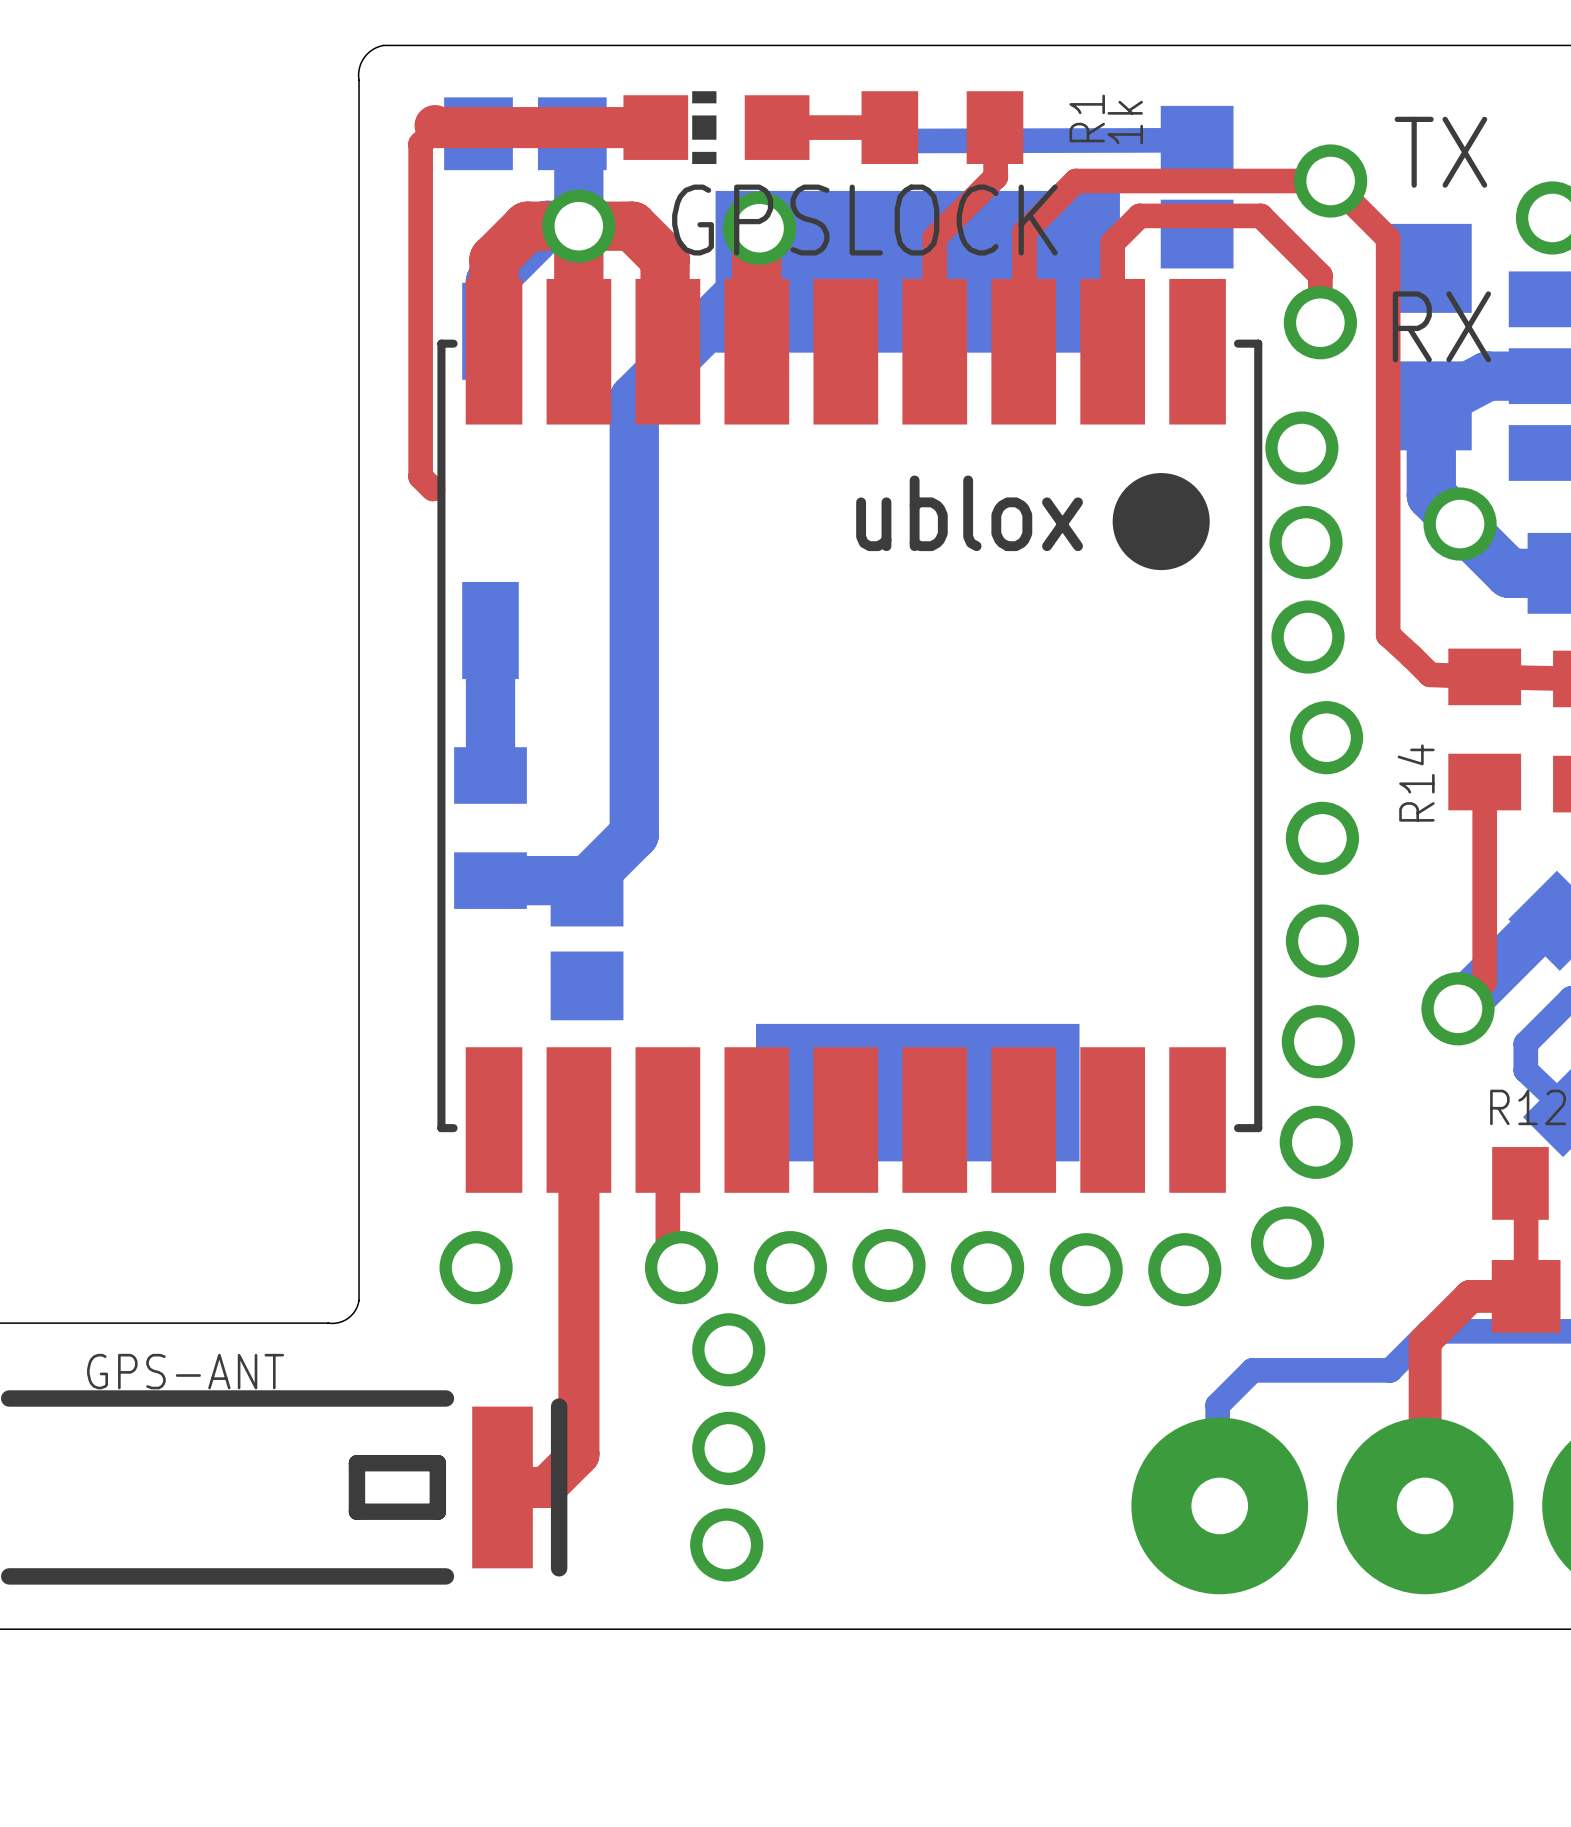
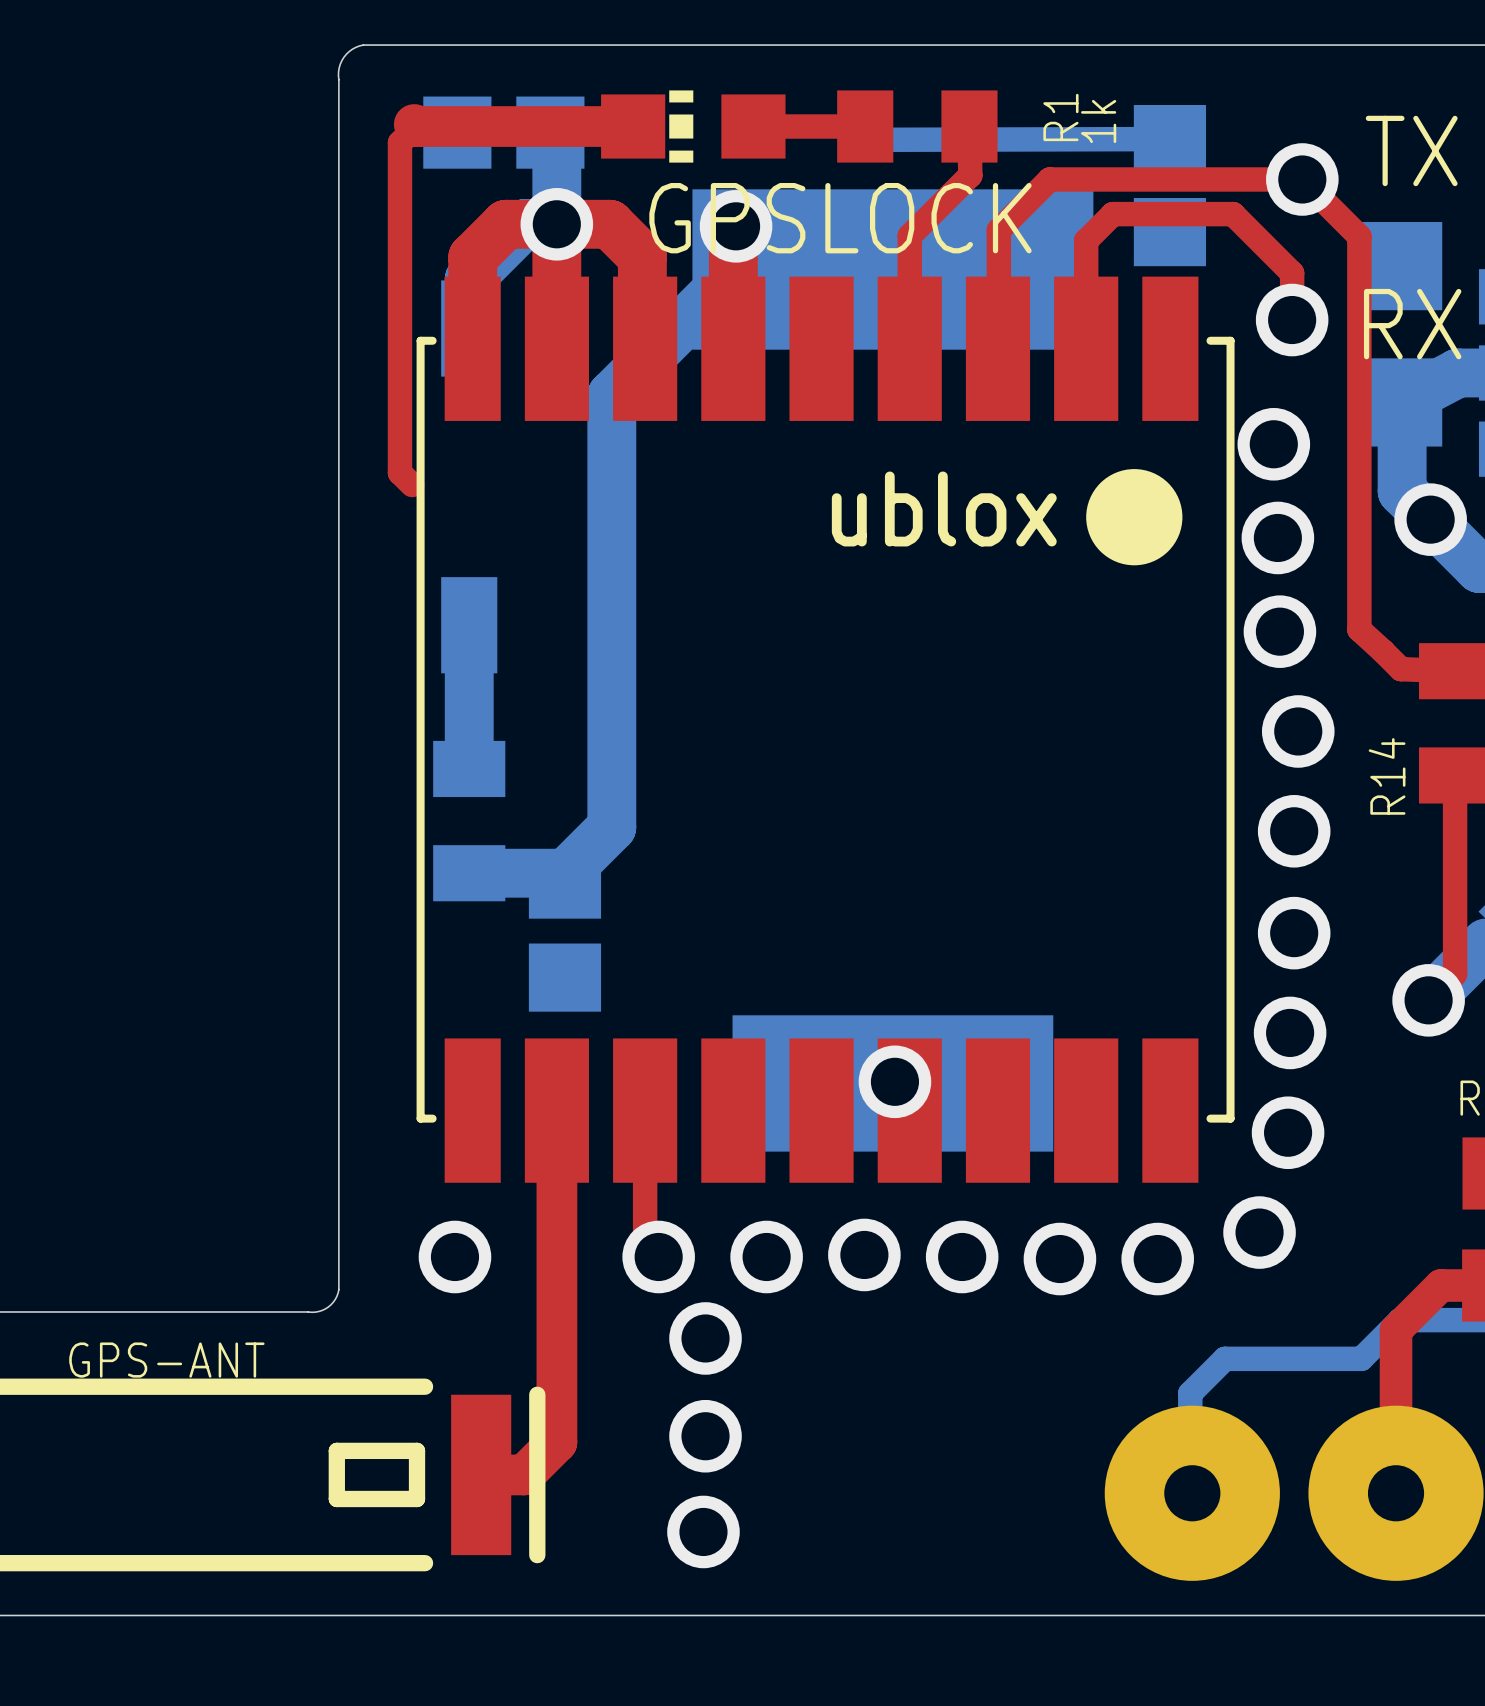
via: none -> (894, 1081)

